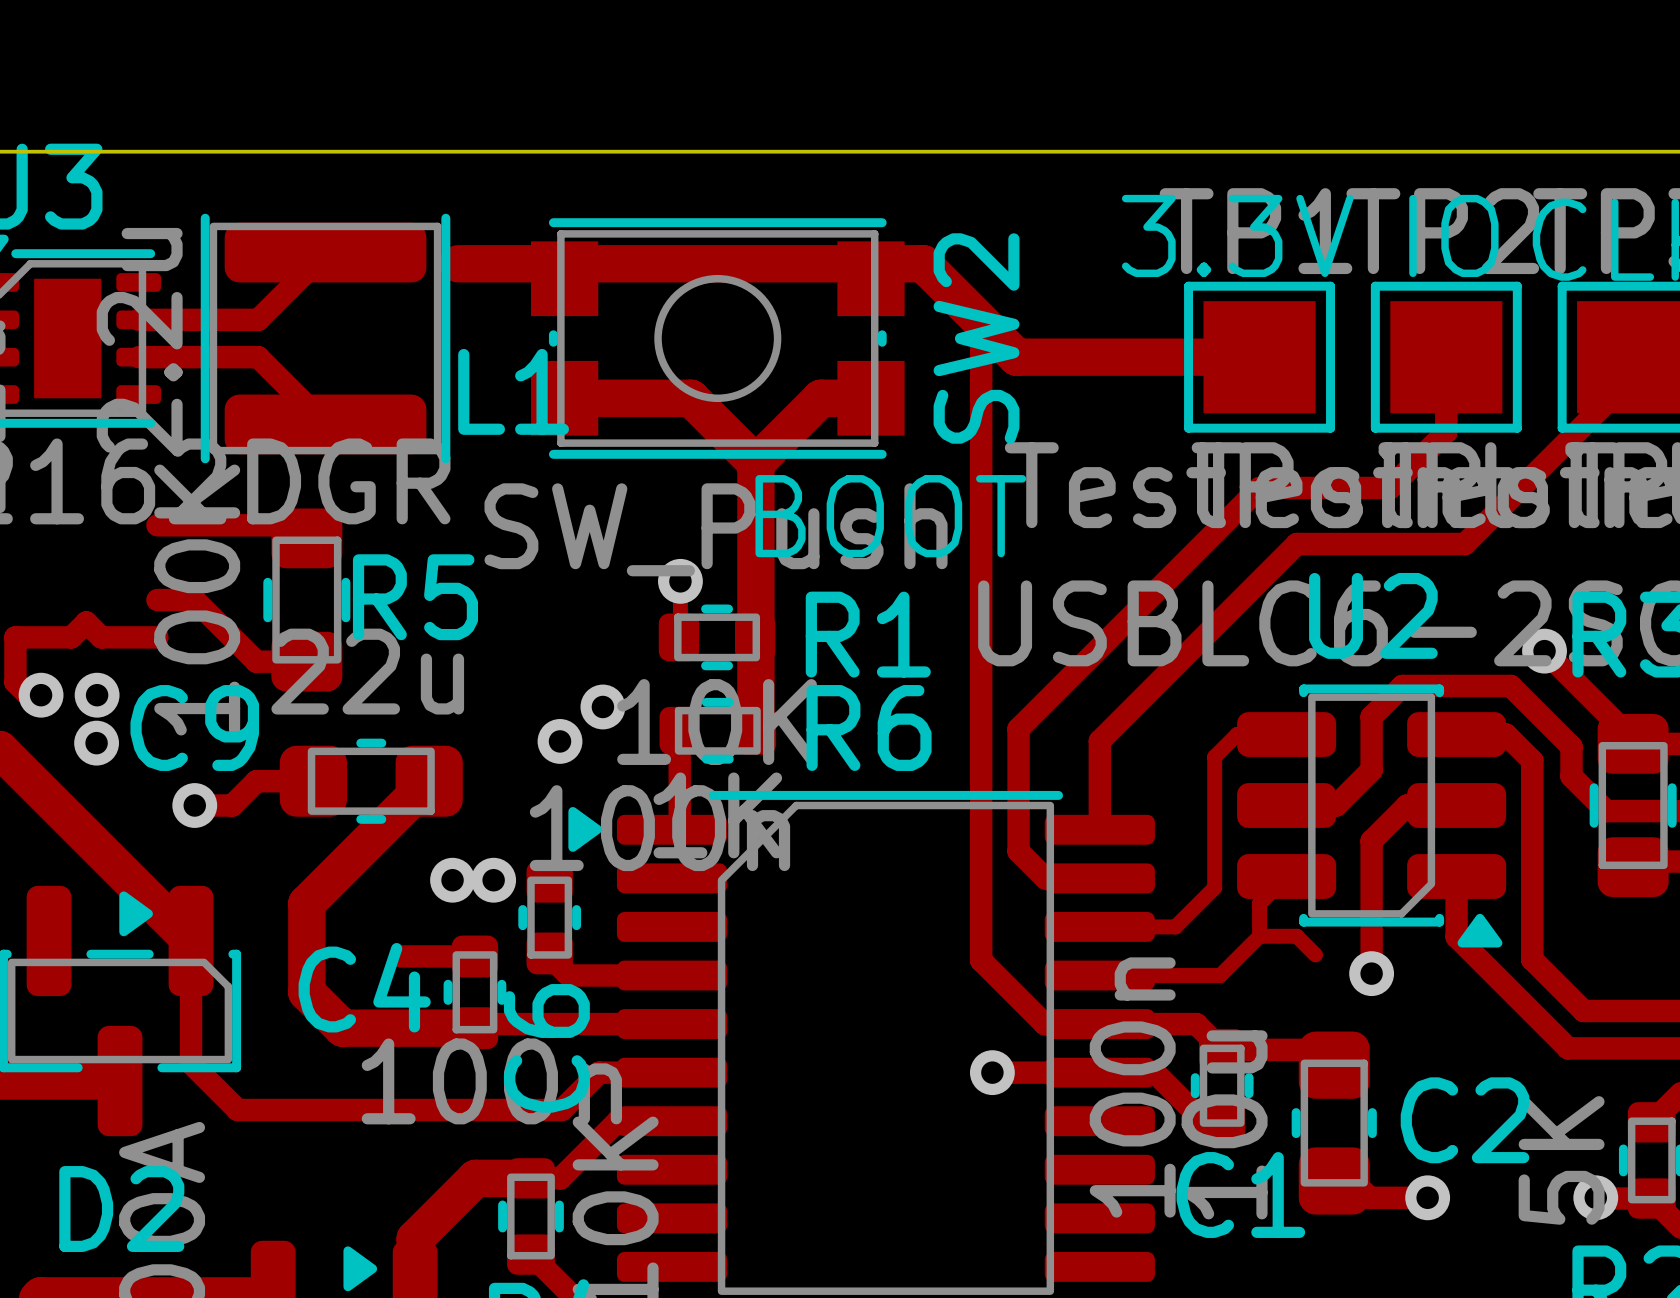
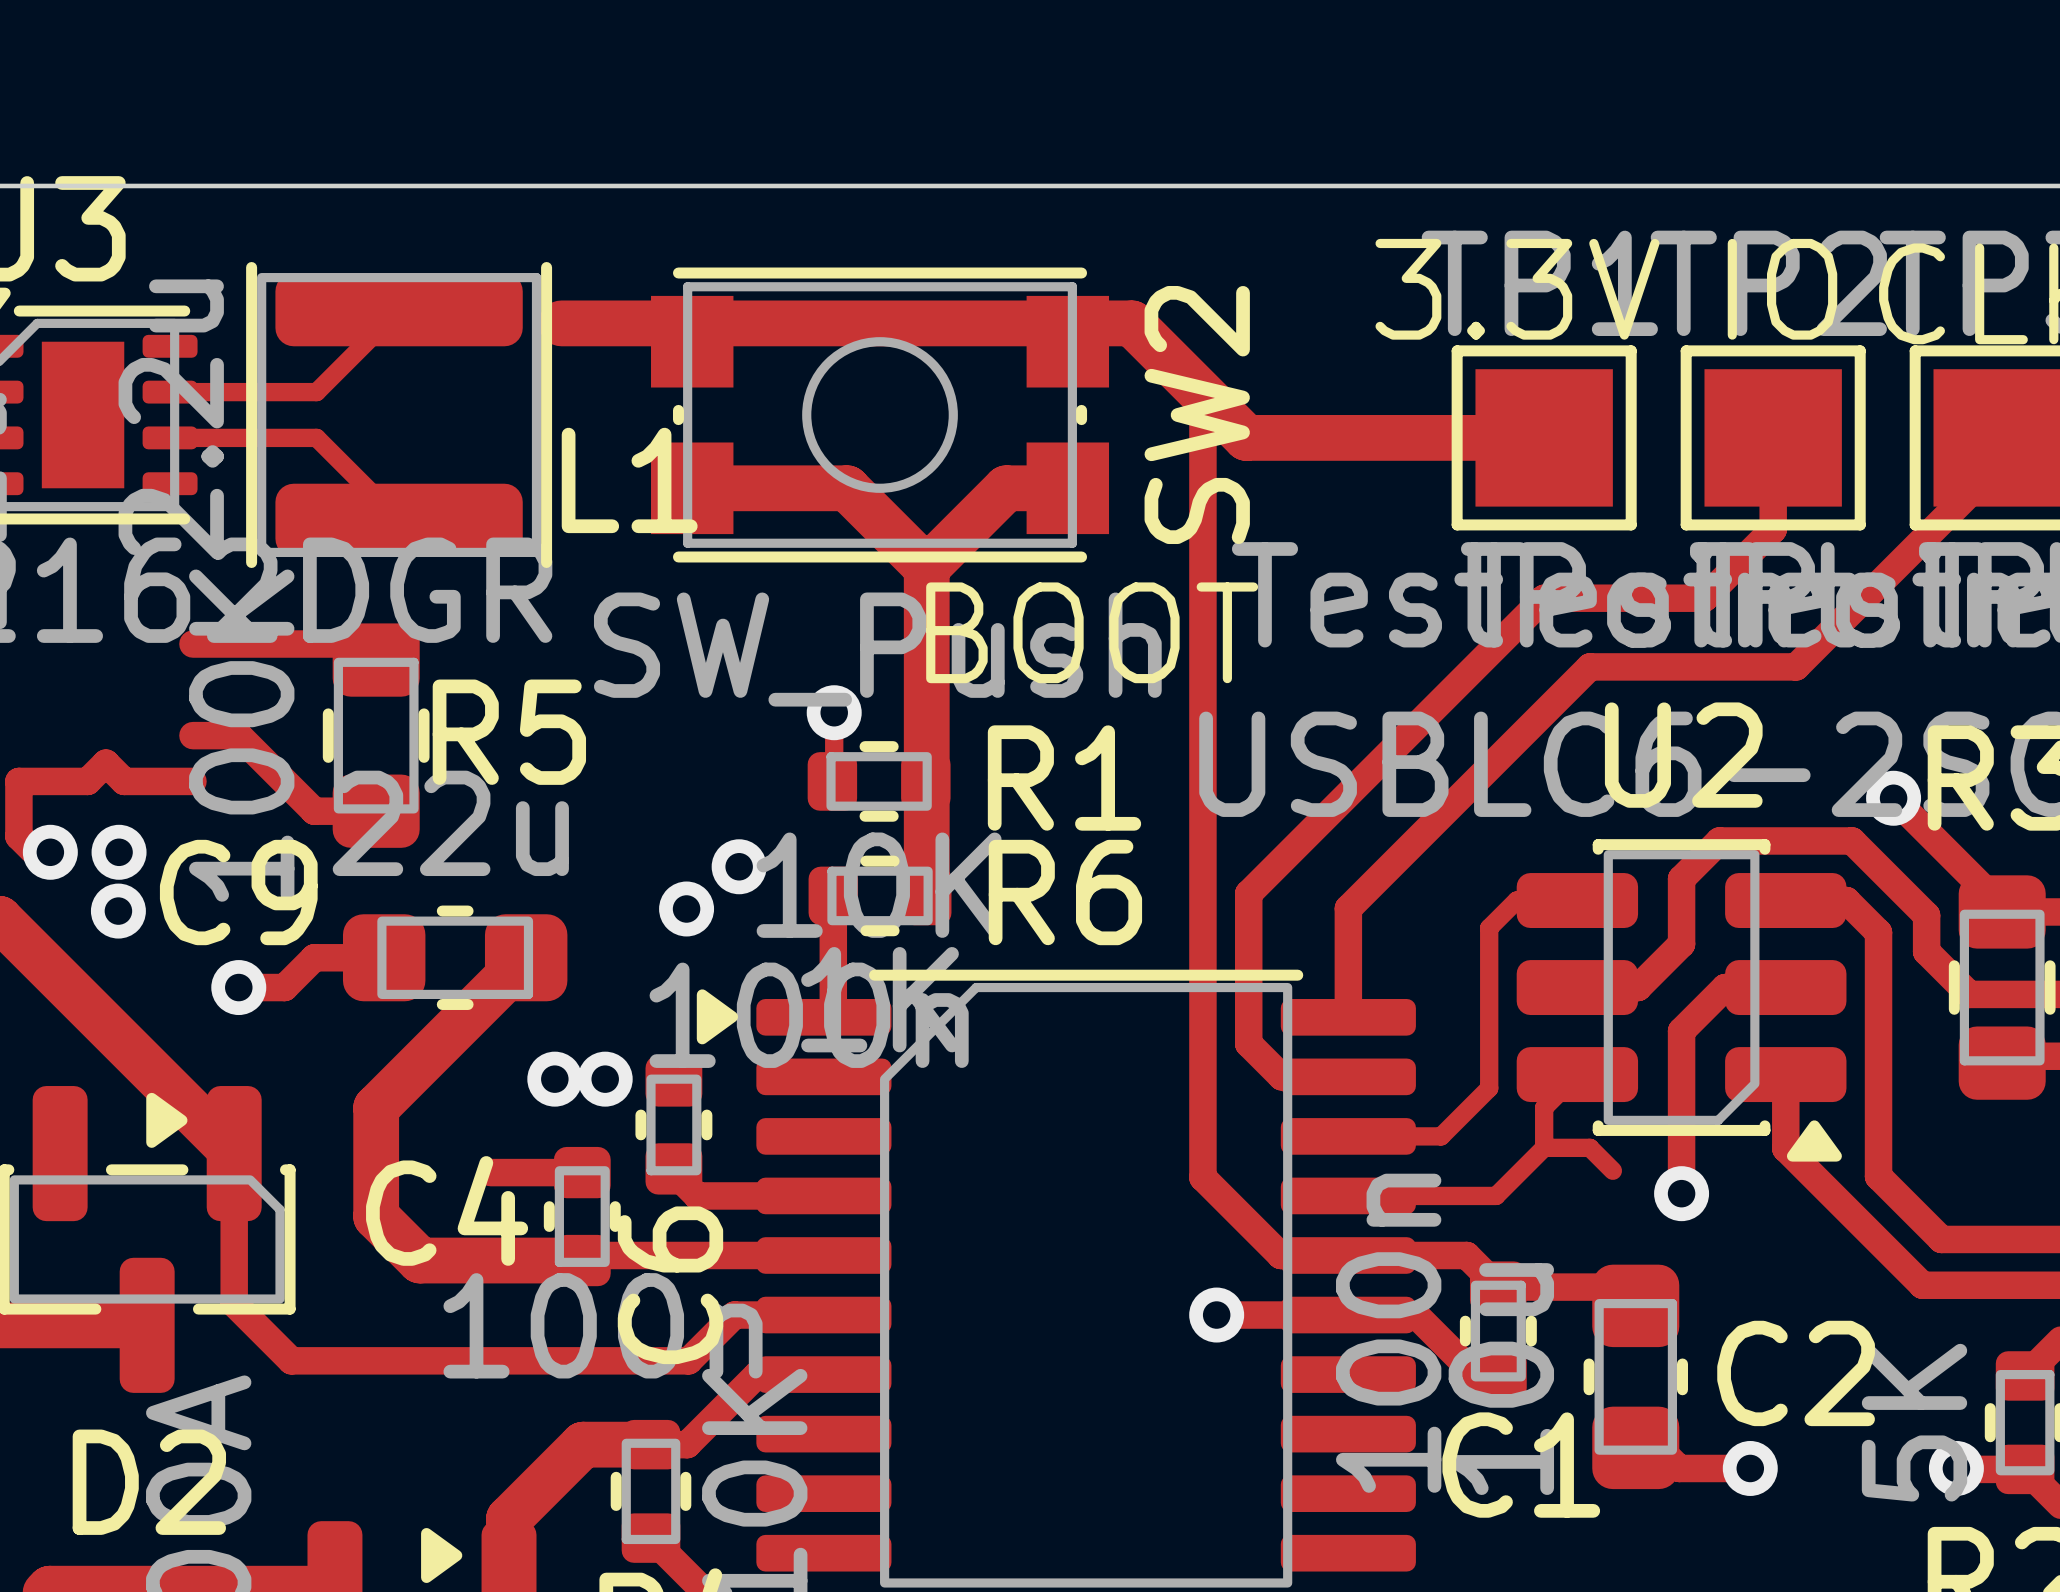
top track width: thick (325, 252) (258, 319) (138, 319) -> thin (399, 309) (316, 392) (170, 392)
top track width: thick (138, 357) (258, 357) (325, 424) -> thin (170, 437) (316, 437) (399, 520)

